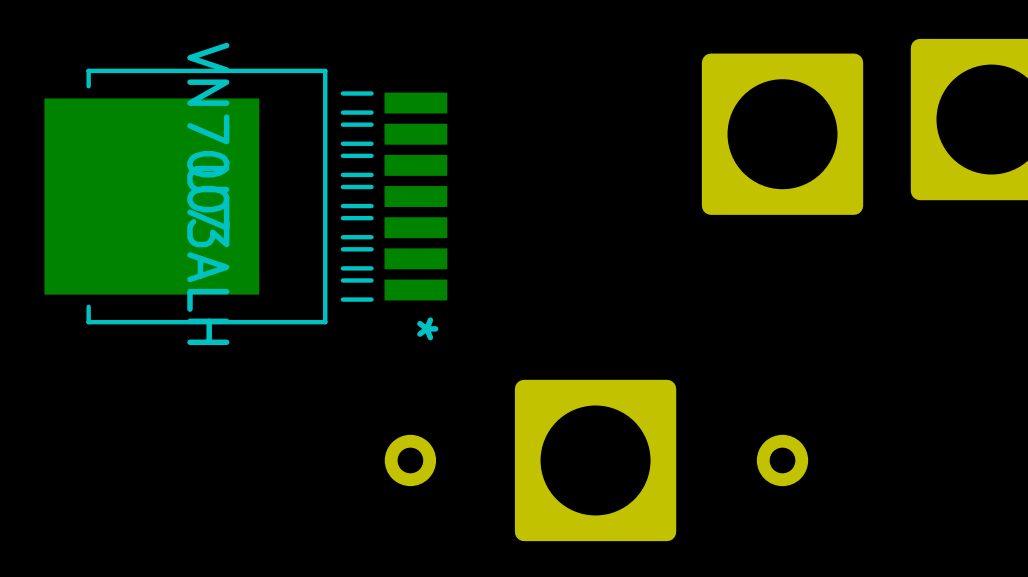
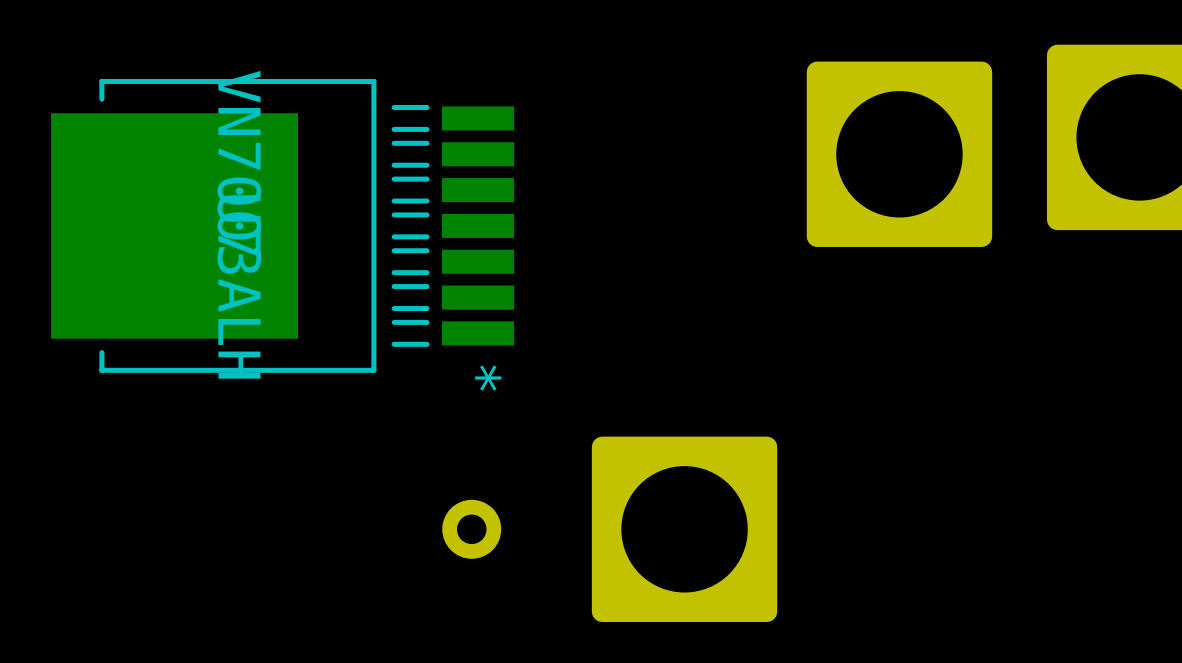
part: (782, 460) -> none

